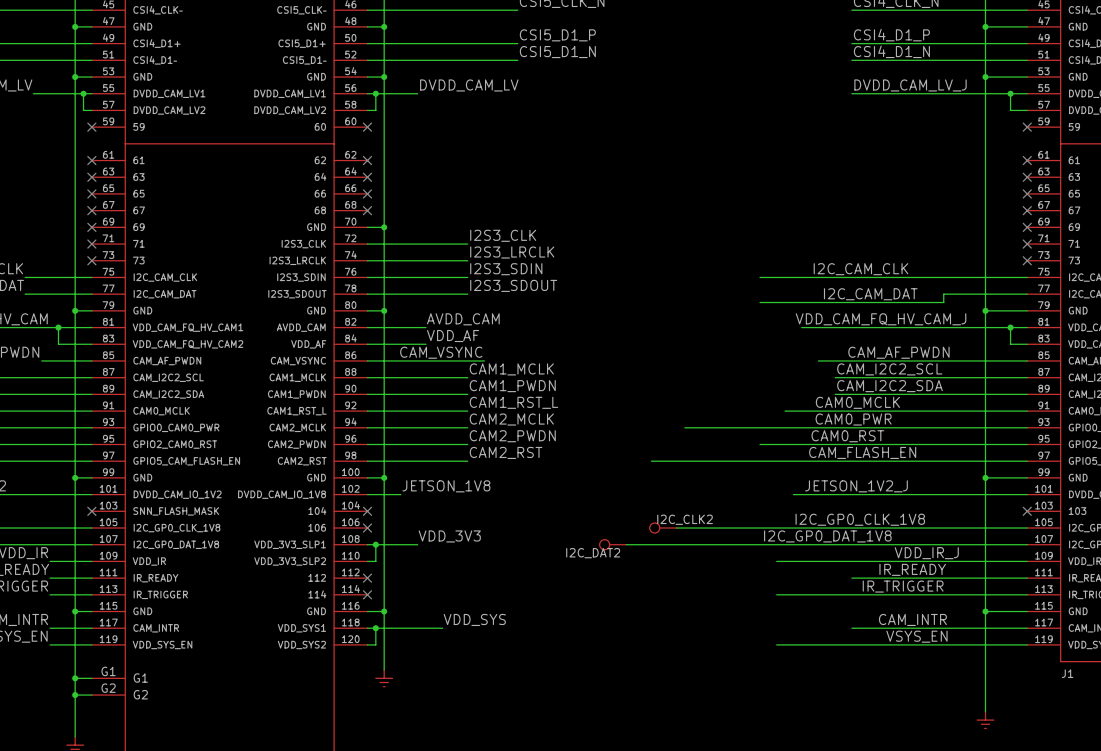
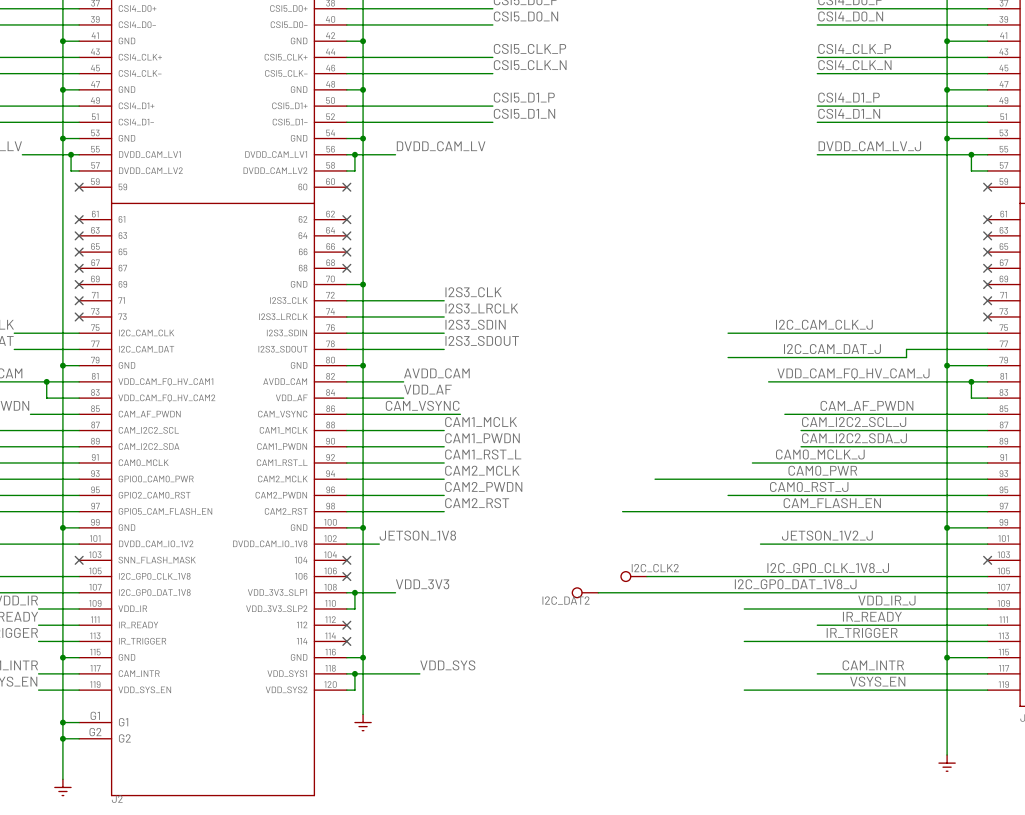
label: I2C_CAM_CLK (861, 269) -> I2C_CAM_CLK_J (824, 324)
label: I2C_CAM_DAT (870, 294) -> I2C_CAM_DAT_J (832, 349)
label: CAM_I2C2_SCL (889, 369) -> CAM_I2C2_SCL_J (854, 422)
label: CAM_I2C2_SDA (889, 386) -> CAM_I2C2_SDA_J (854, 438)
label: CAM0_MCLK (857, 402) -> CAM0_MCLK_J (820, 454)
label: CAM0_RST (847, 436) -> CAM0_RST_J (809, 486)
label: I2C_GP0_CLK_1V8 (860, 519) -> I2C_GP0_CLK_1V8_J (828, 568)
label: I2C_GP0_DAT_1V8 (827, 536) -> I2C_GP0_DAT_1V8_J (795, 584)

